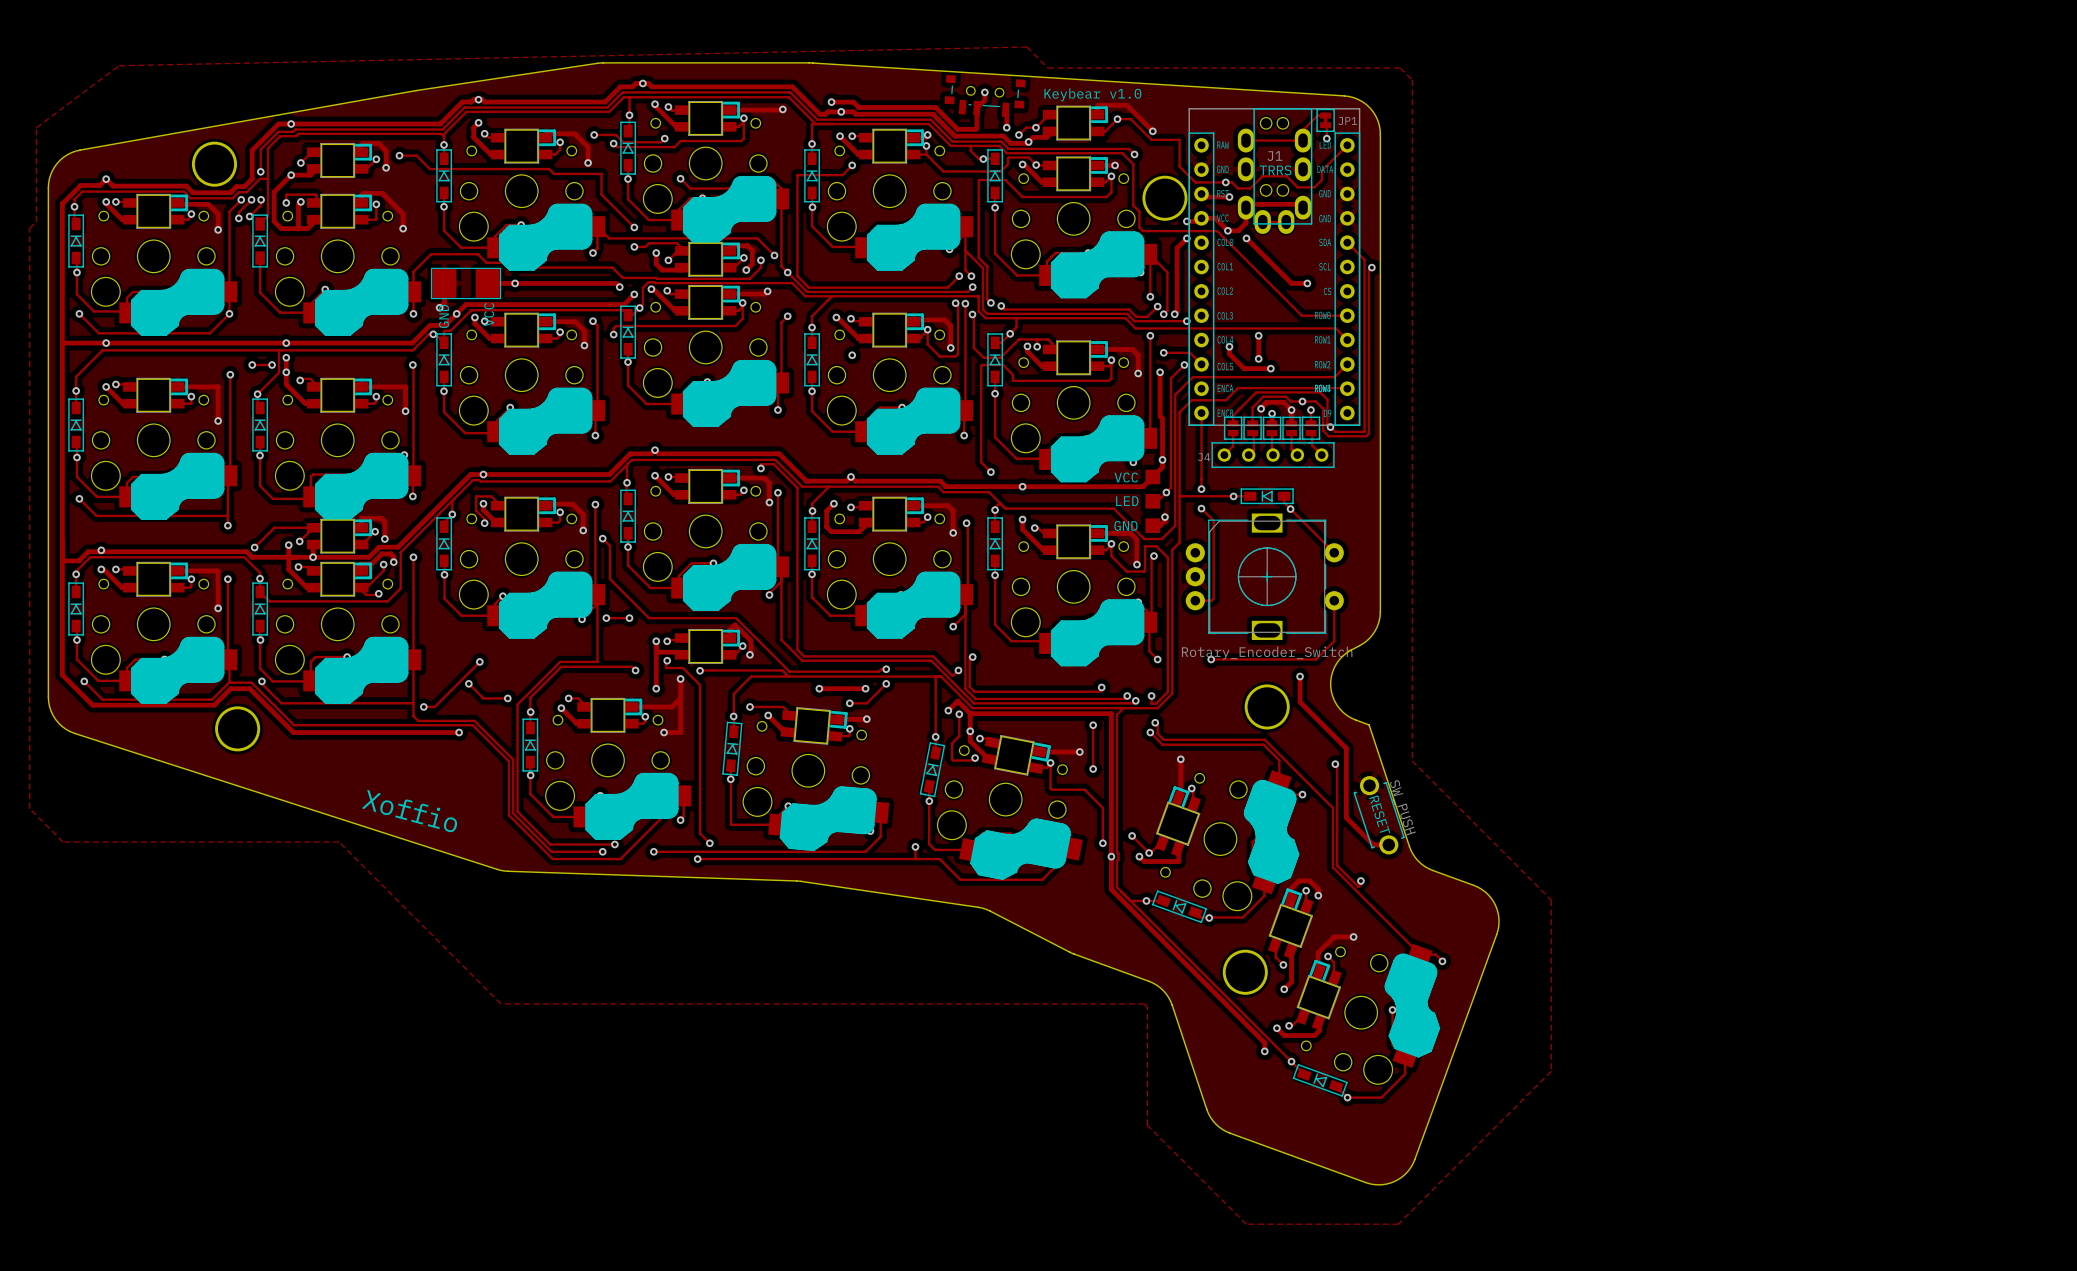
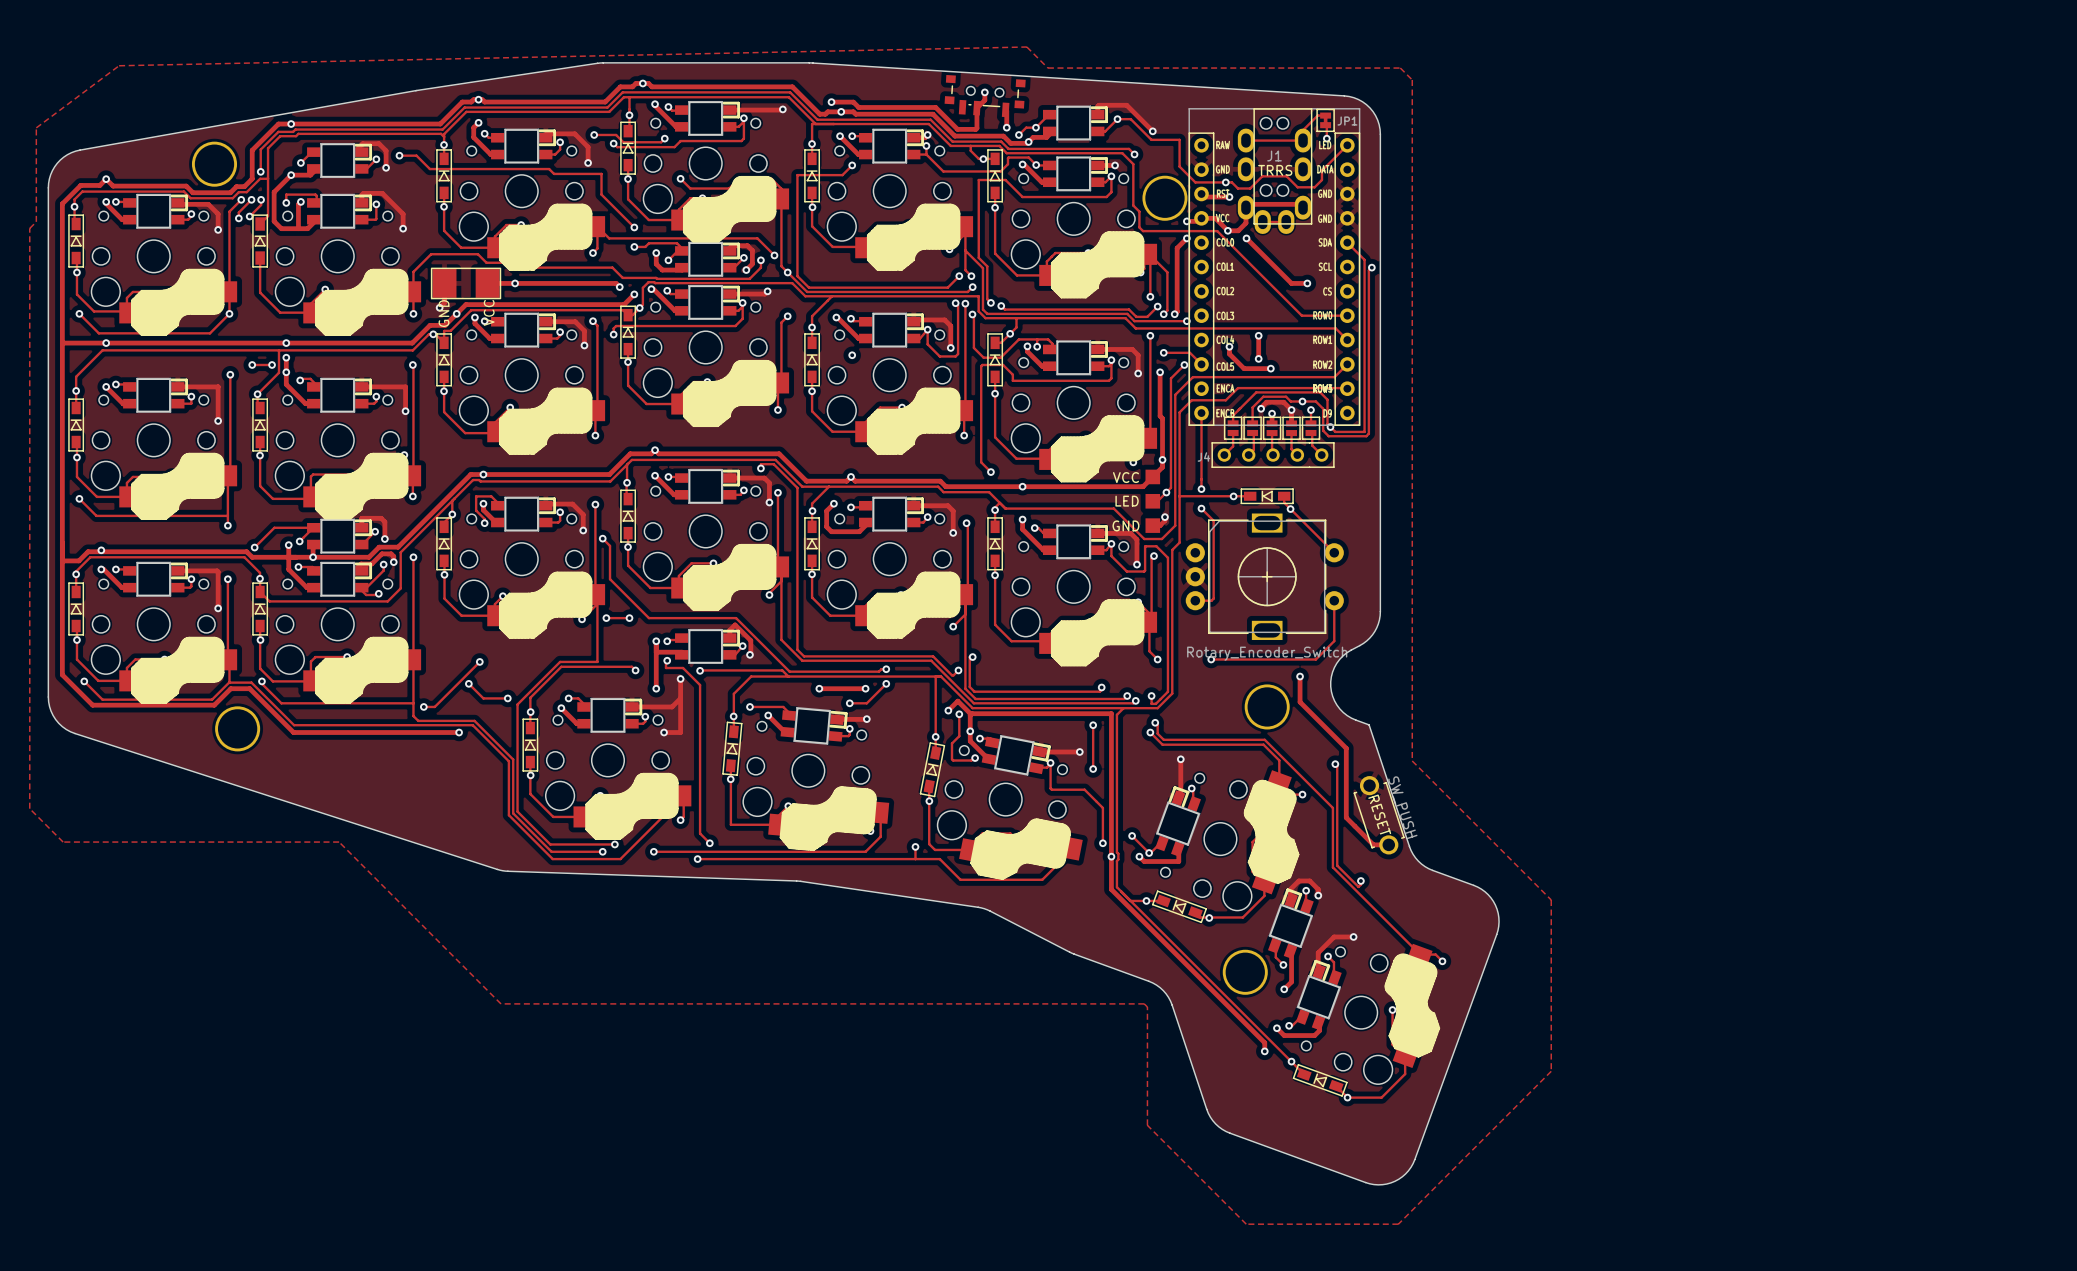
text: Keybear v1.0 (1092, 94) -> none
text: Xoffio (409, 811) -> none

